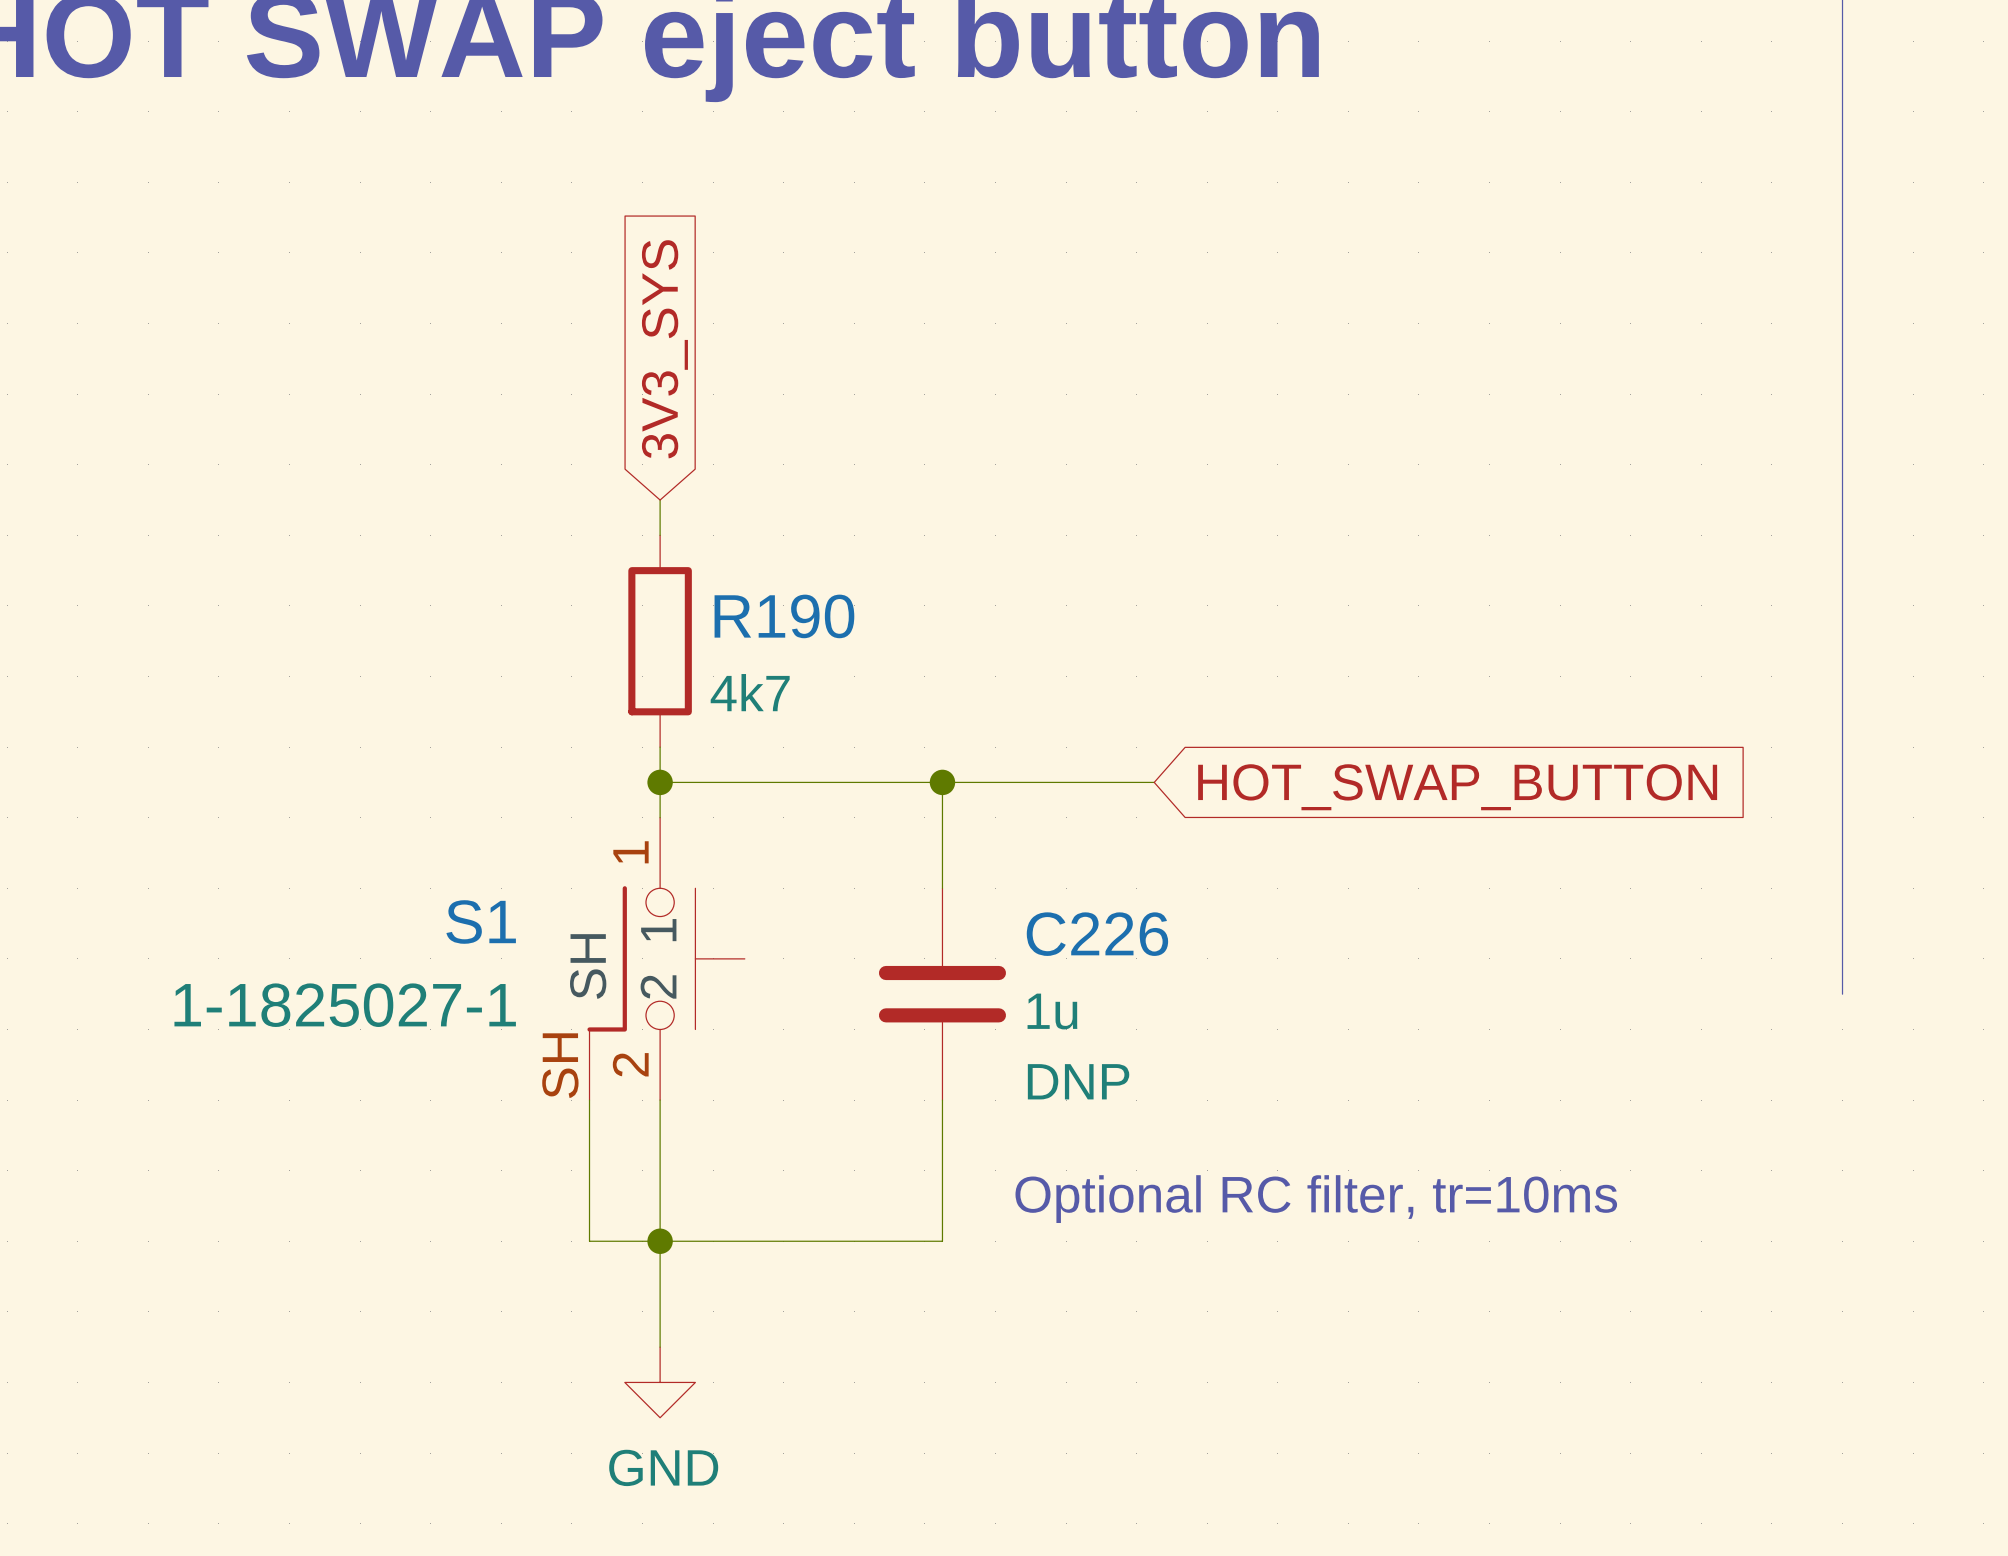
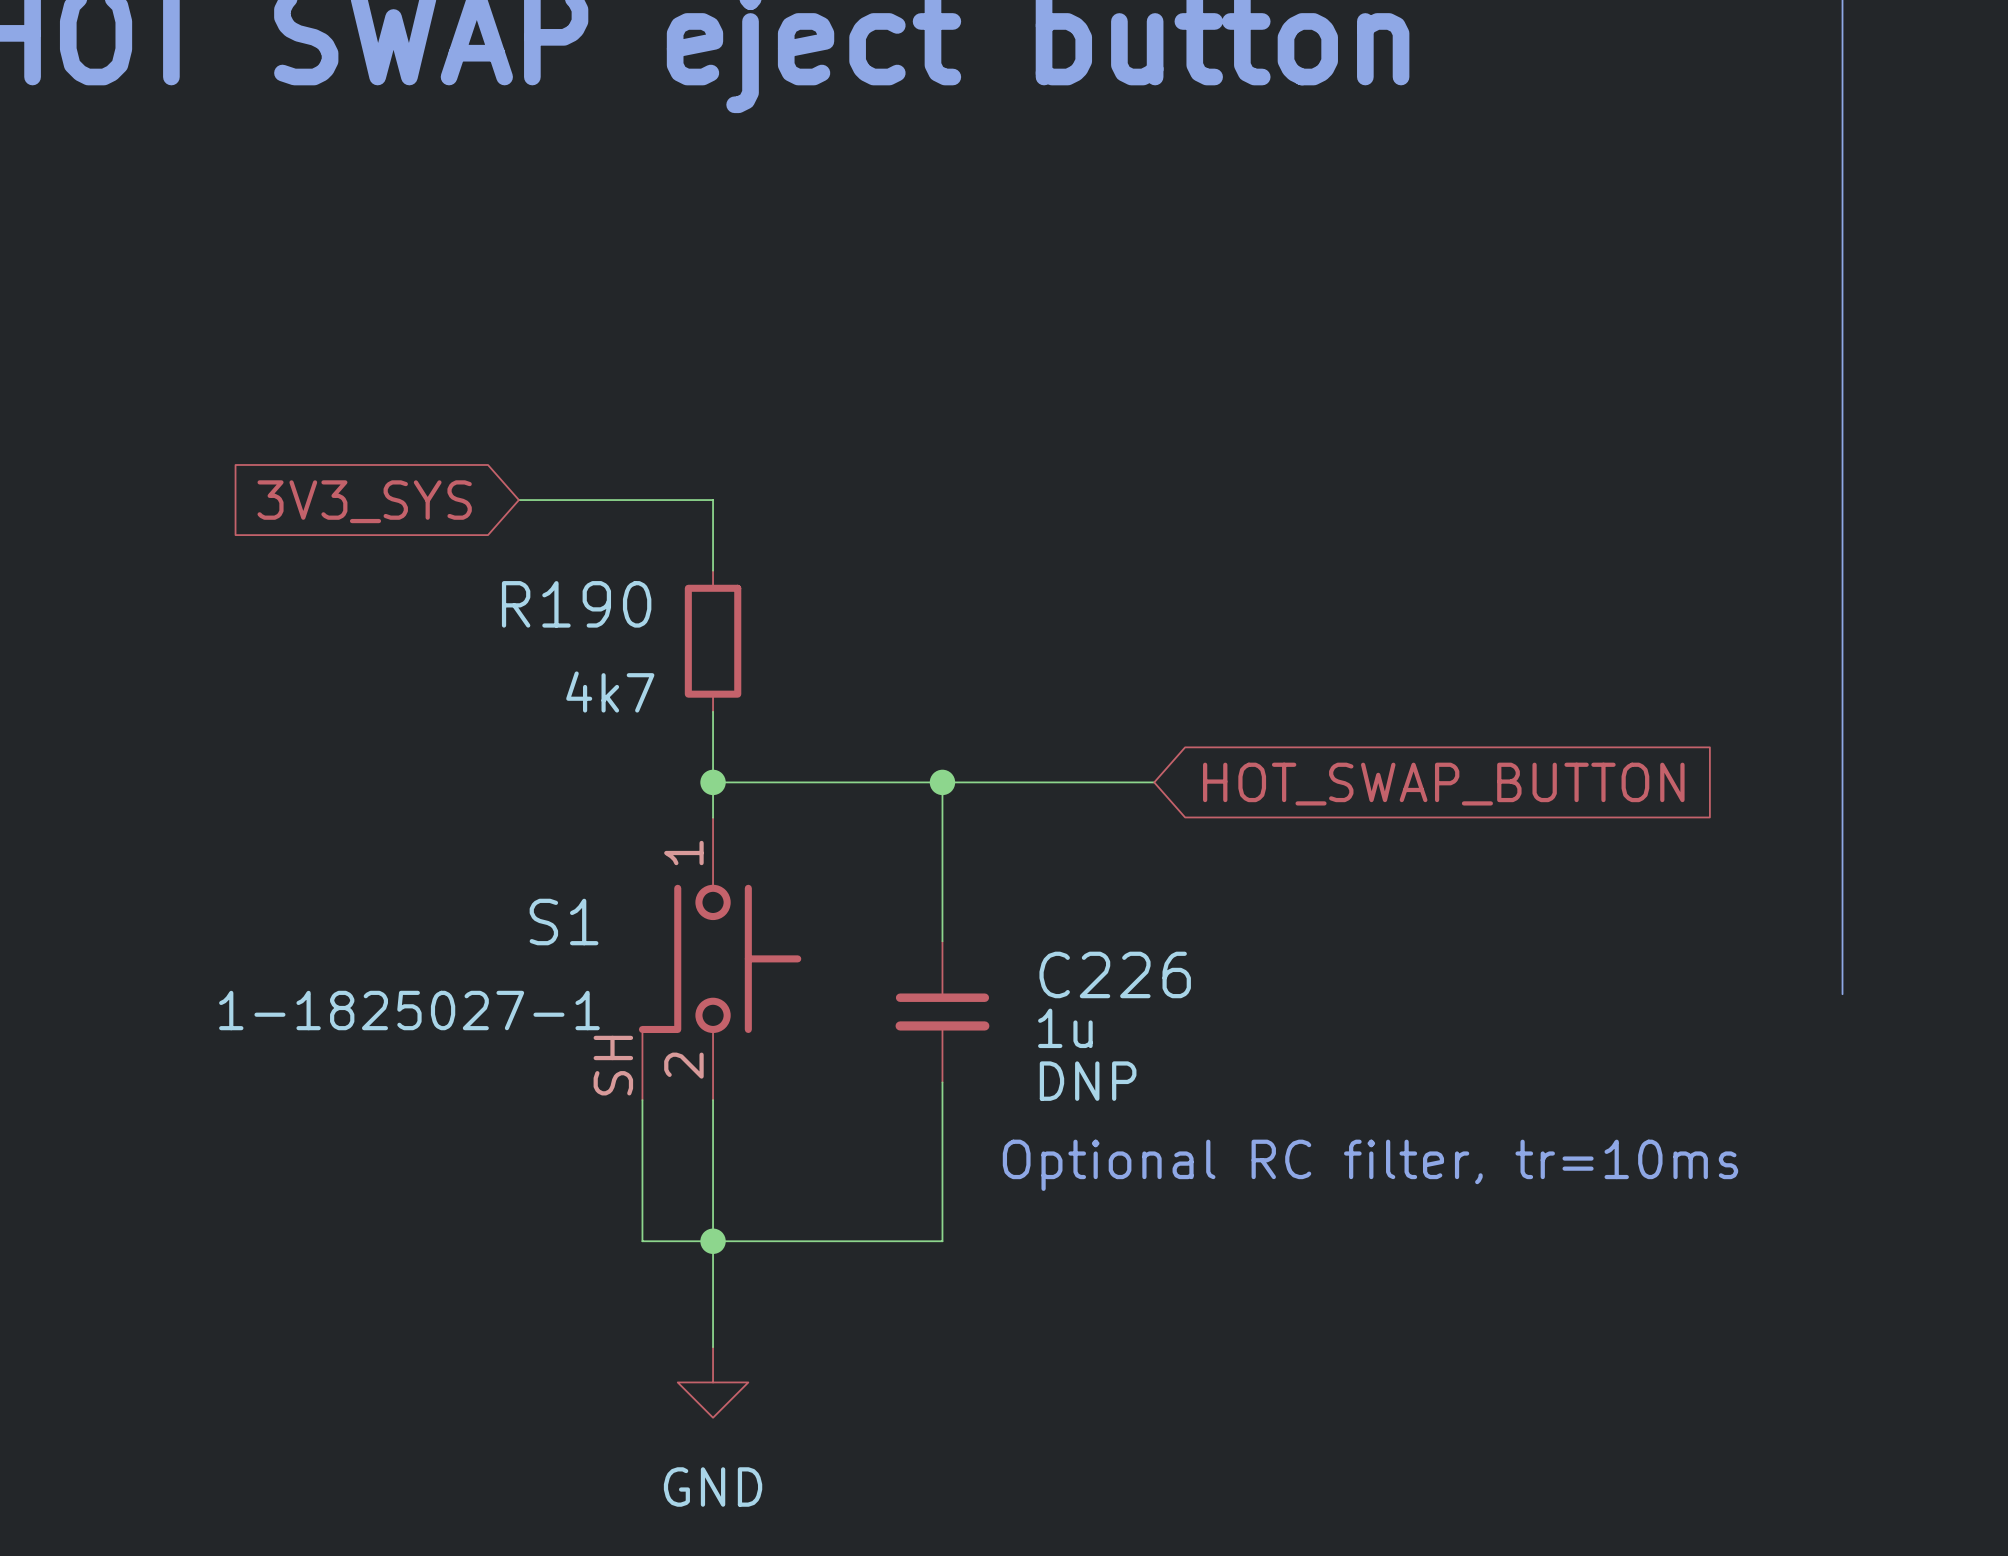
global label rotation: 0° (664, 349) -> 90° counterclockwise (364, 501)
global label position: 3V3_SYS (664, 349) -> 3V3_SYS (364, 501)
wire: none -> (518, 500) (713, 500) (713, 570)
wire: (660, 500) (660, 535) -> none
R190 symbol: [628, 535, 692, 748] -> [684, 570, 742, 712]
R190 name position: R190 (784, 616) -> R190 (576, 604)
R190 text position: 4k7 (750, 692) -> 4k7 (610, 692)
wire: none -> (713, 711) (713, 817)
wire: (660, 747) (660, 817) -> none
wire: (660, 782) (713, 782) -> none
junction position: (660, 782) -> (713, 782)
S1 symbol: [587, 817, 745, 1101] -> [638, 817, 802, 1101]
C226 symbol: [878, 888, 1007, 1101] -> [895, 941, 990, 1083]
S1 value: 1-1825027-1 (345, 1005) -> none
S1 text: none -> 1-1825027-1 (409, 1010)
wire: (589, 1100) (589, 1241) (642, 1241) -> (642, 1100) (642, 1241)
wire: (660, 1100) (660, 1347) -> (713, 1100) (713, 1347)
text position: Optional RC filter, tr=10ms (1316, 1199) -> Optional RC filter, tr=10ms (1370, 1165)
junction position: (660, 1241) -> (713, 1241)
power symbol position: GND (660, 1382) -> GND (713, 1382)
power symbol text position: GND (663, 1467) -> GND (713, 1487)

